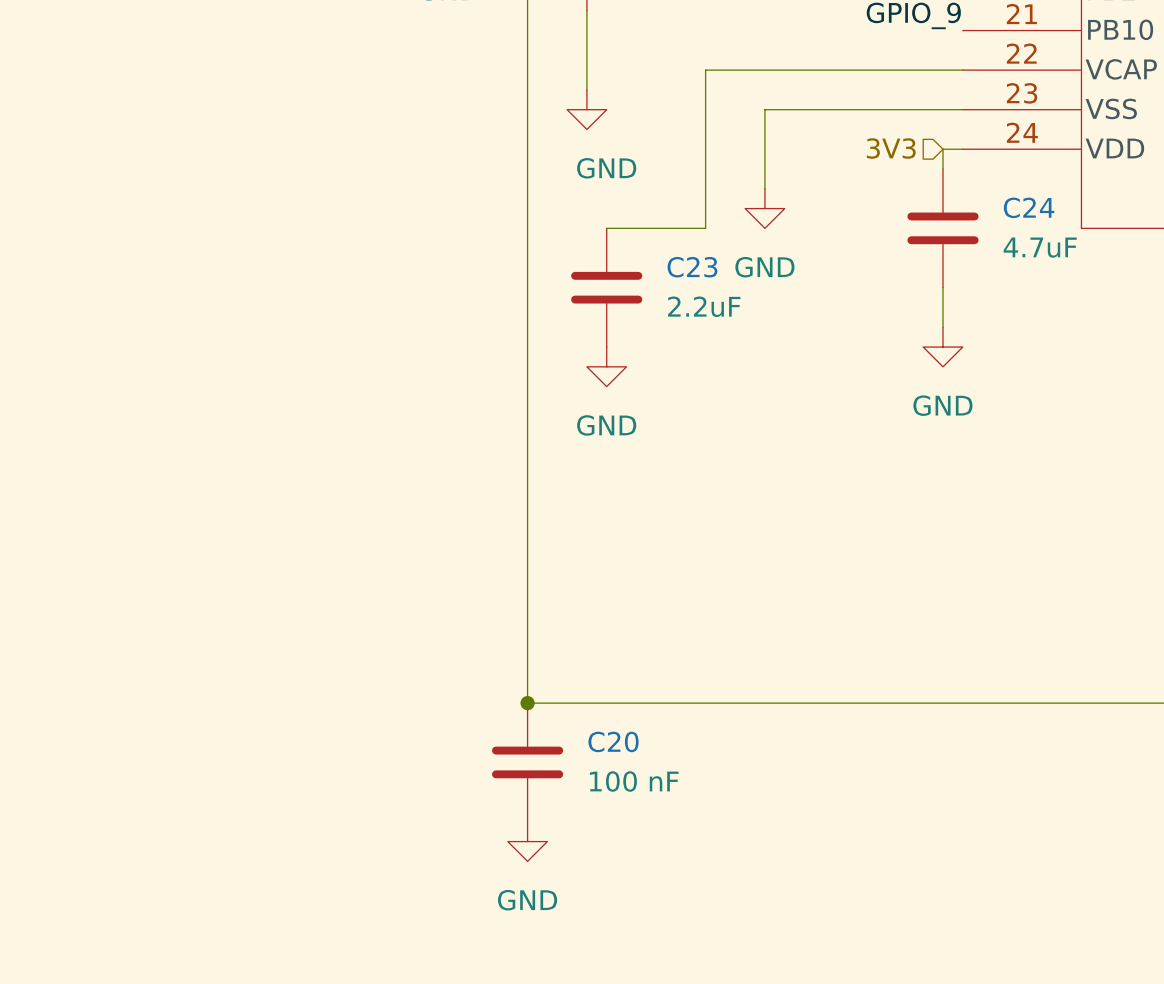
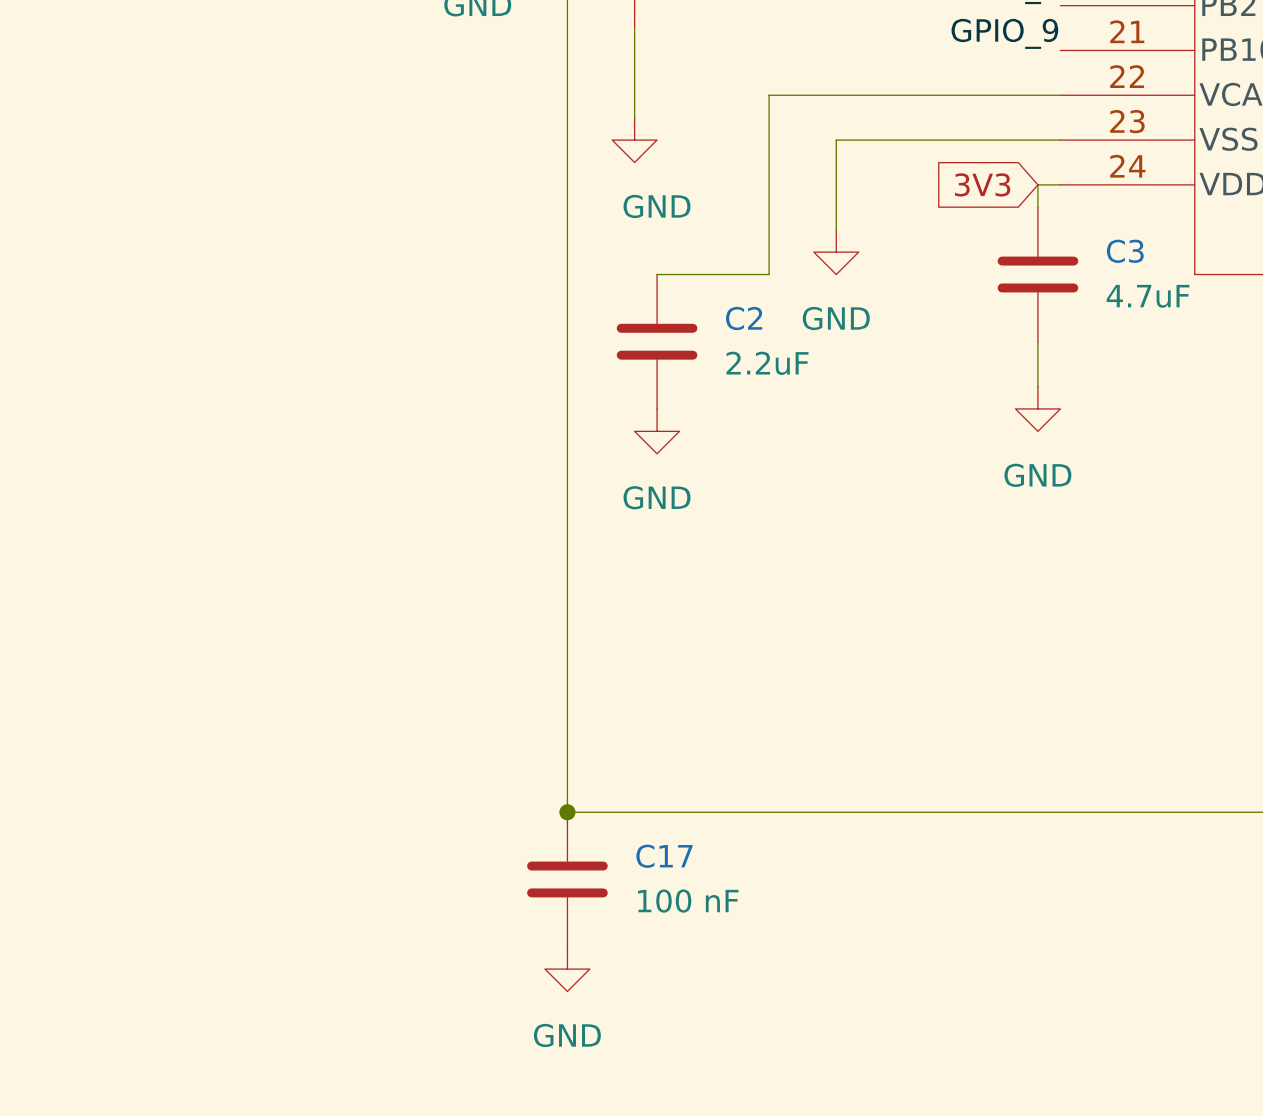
hierarchical label: 3V3 (891, 148) -> none
global label: none -> 3V3 (982, 184)
C24 name: C24 (1029, 207) -> C3 (1125, 251)
C23 name: C23 (692, 267) -> C2 (744, 318)
C20 name: C20 (613, 741) -> C17 (664, 856)

